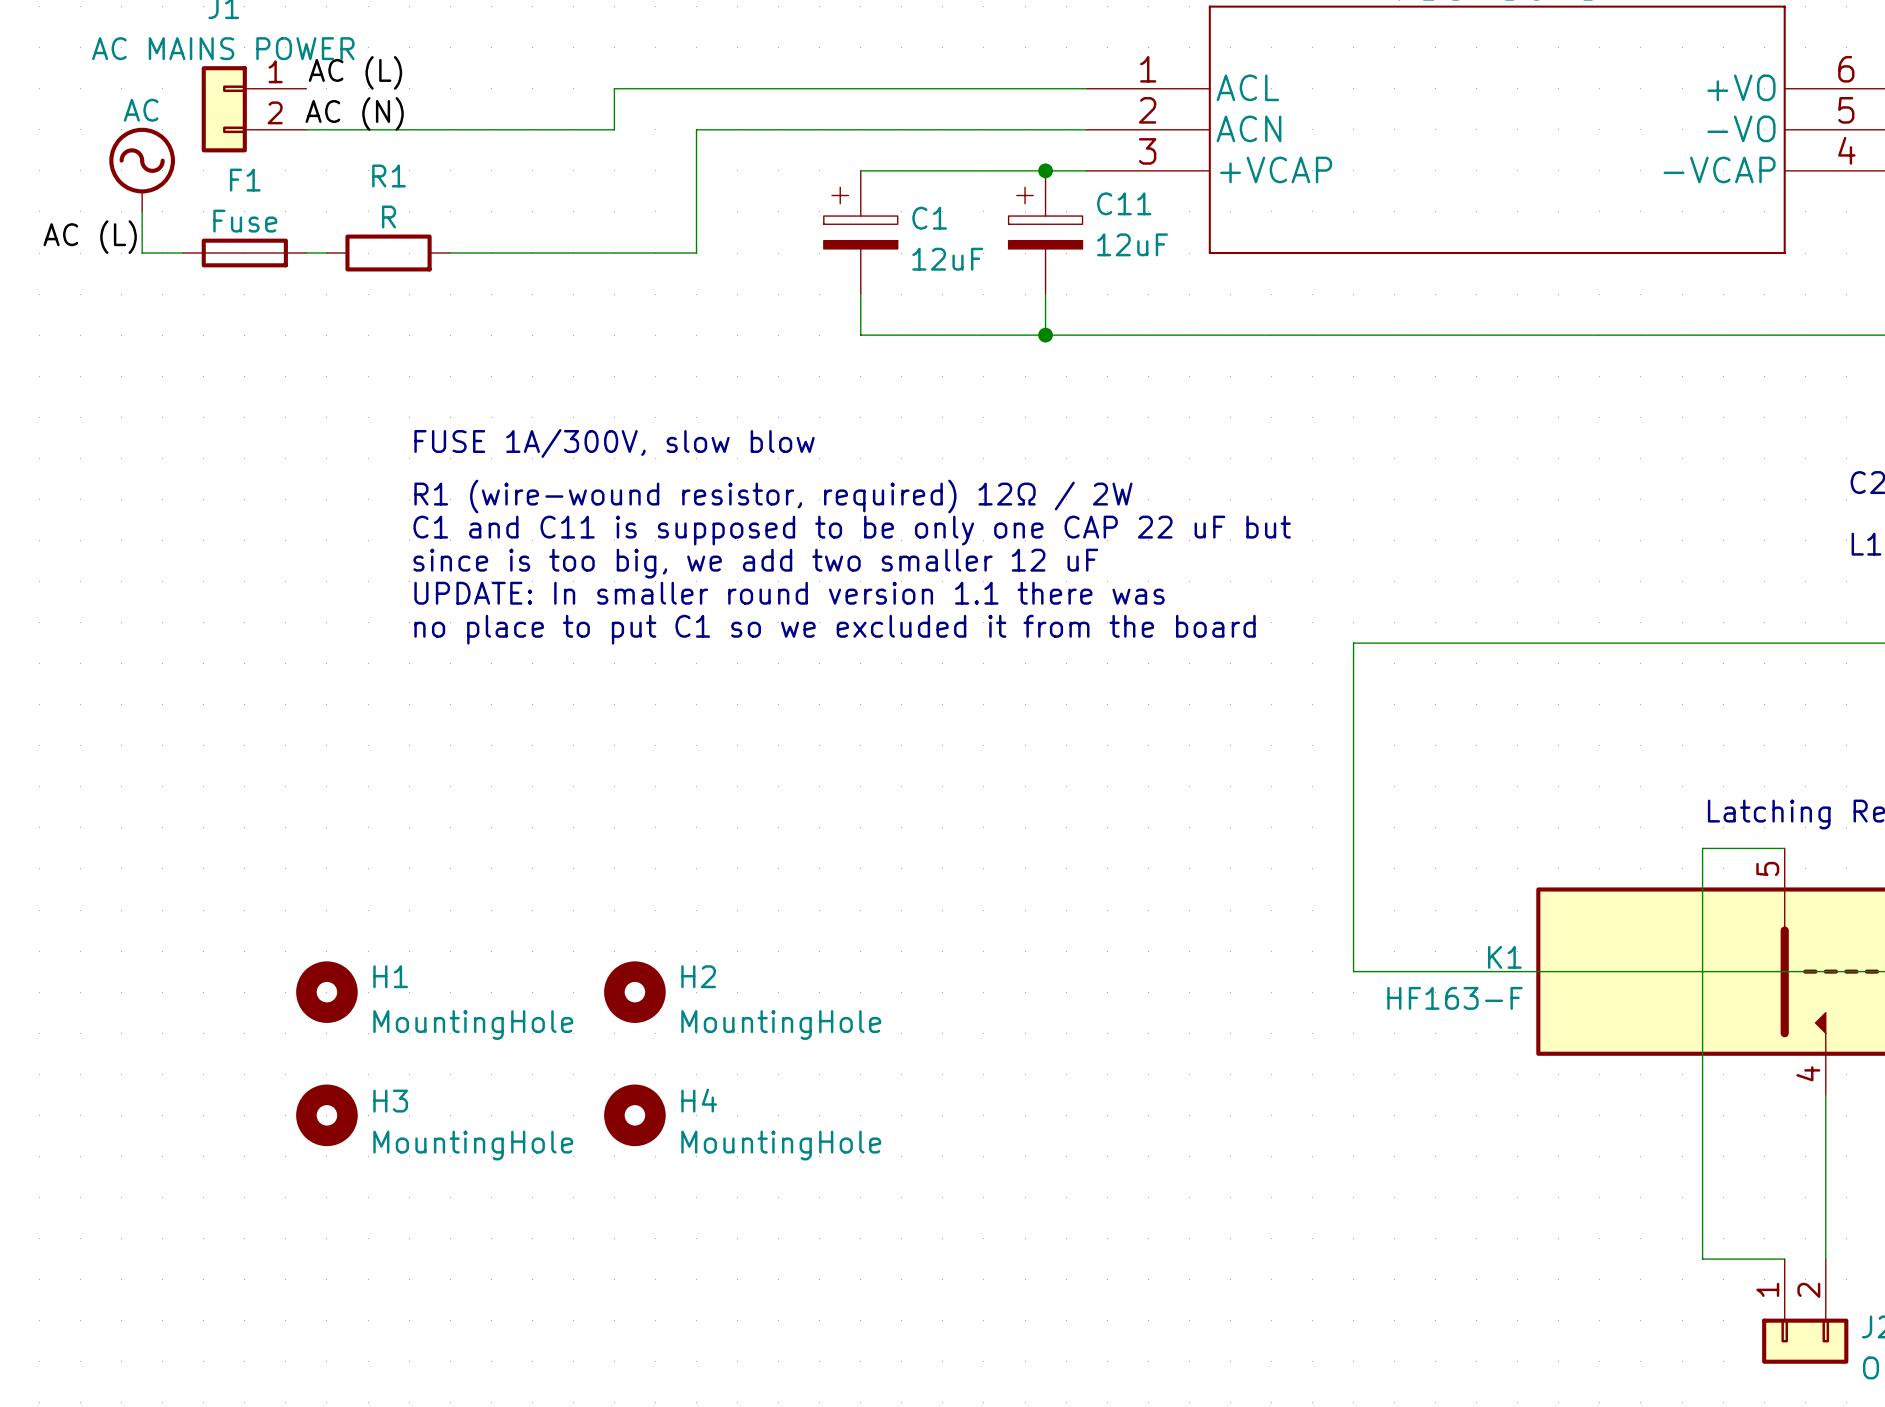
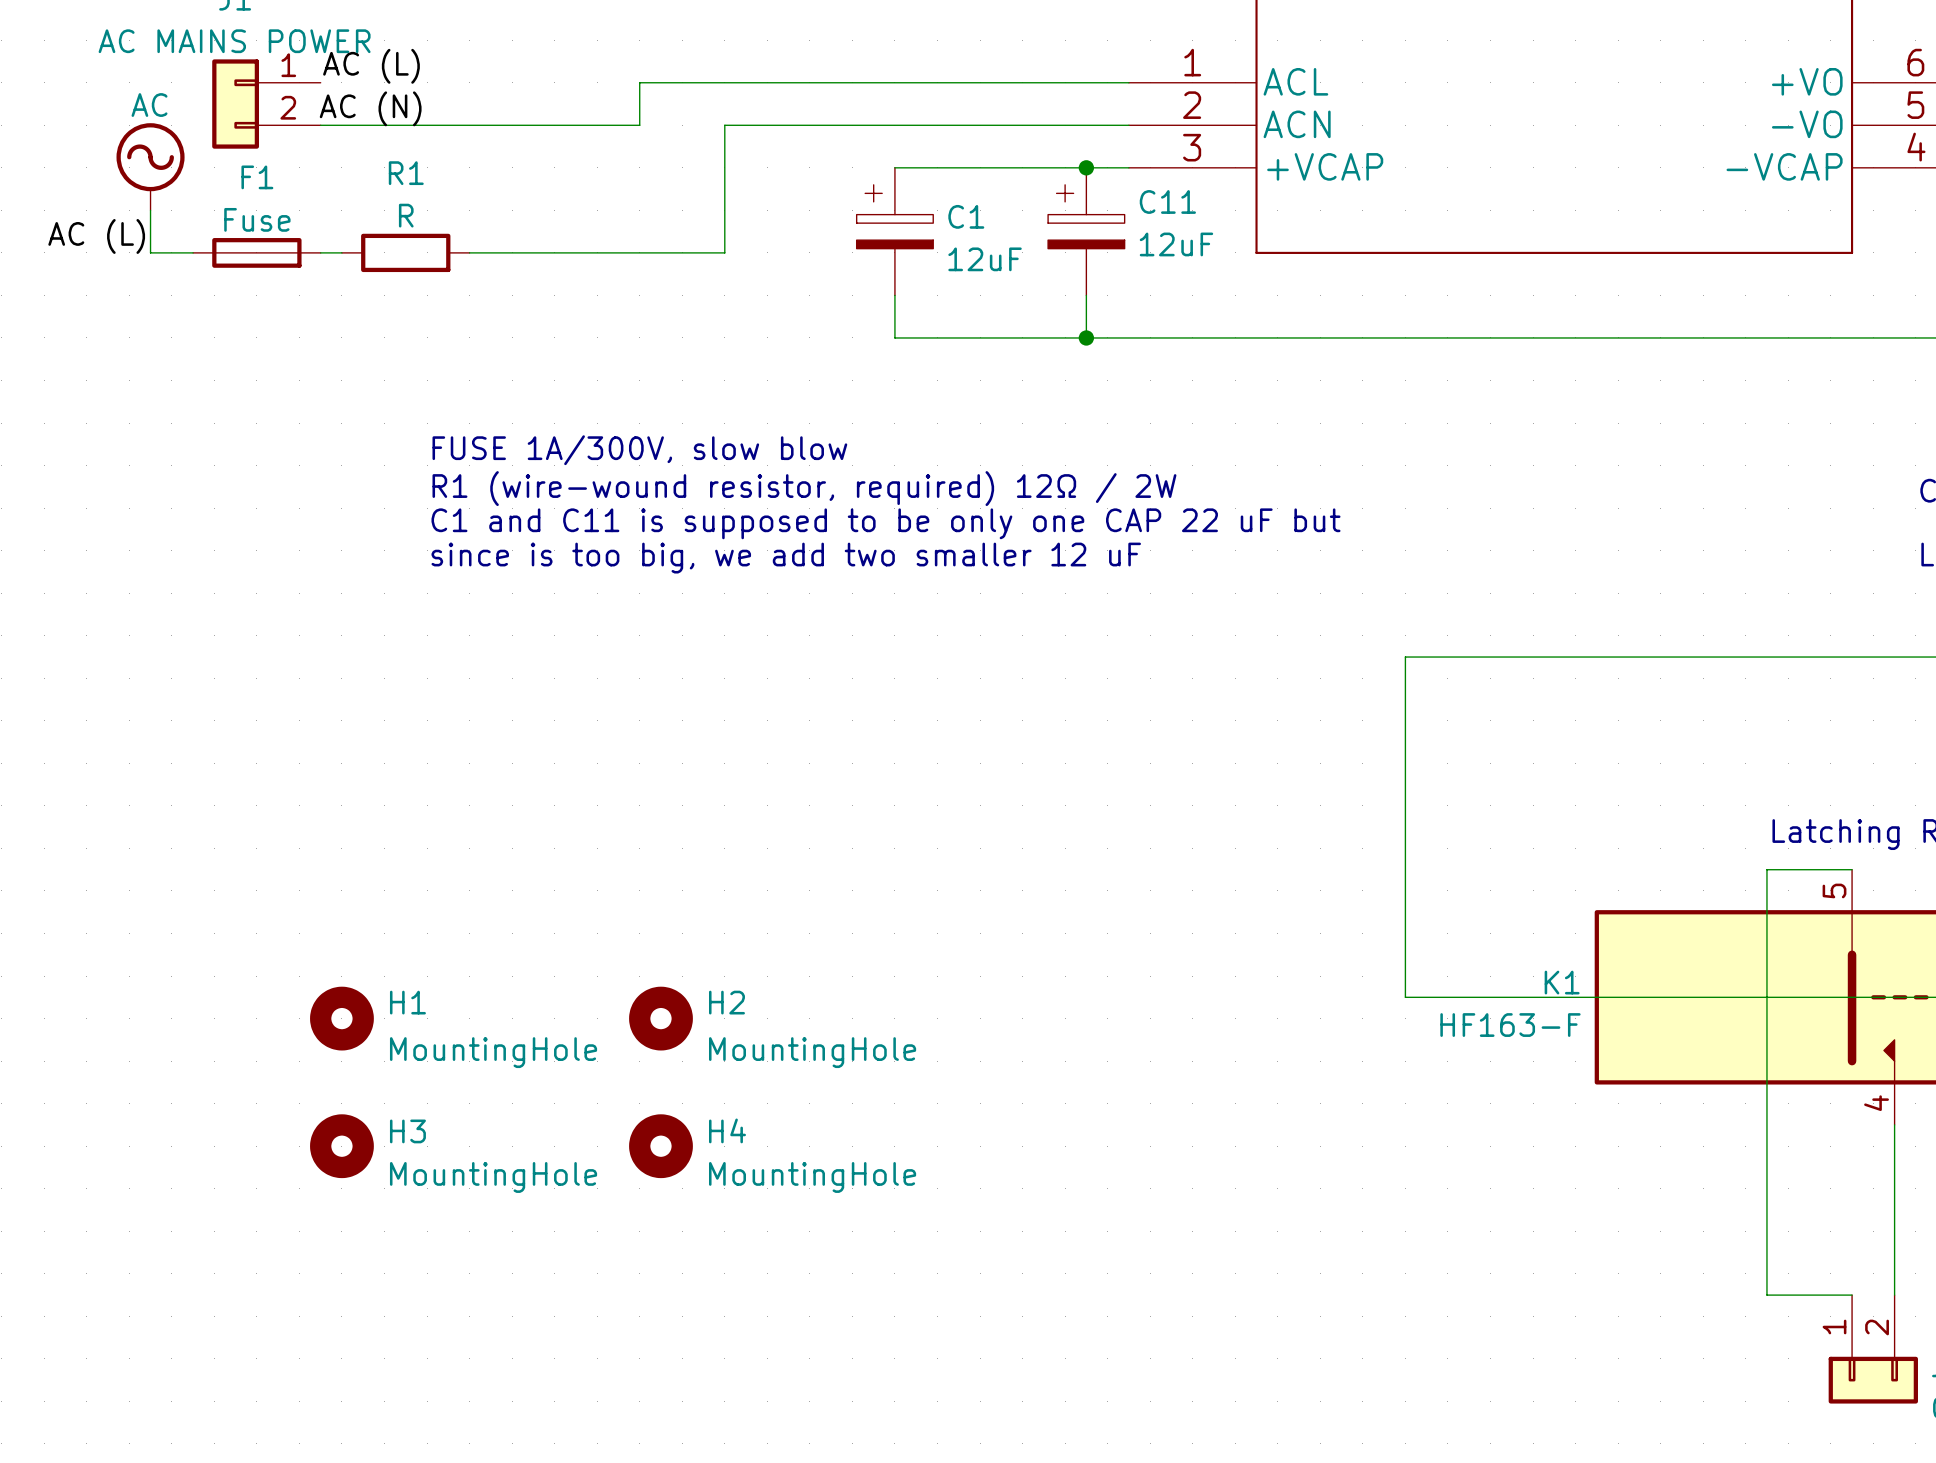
text position: R1 (wire-wound resistor, required) 12Ω / 2W (773, 496) -> R1 (wire-wound resistor, required) 12Ω / 2W (804, 488)
text position: C1 and C11 is supposed to be only one CAP 22 uF but (852, 530) -> C1 and C11 is supposed to be only one CAP 22 uF but (885, 523)
text position: since is too big, we add two smaller 12 uF (755, 563) -> since is too big, we add two smaller 12 uF (786, 558)
text: UPDATE: In smaller round version 1.1 there was (789, 593) -> none
text: no place to put C1 so we excluded it from the board (835, 629) -> none

